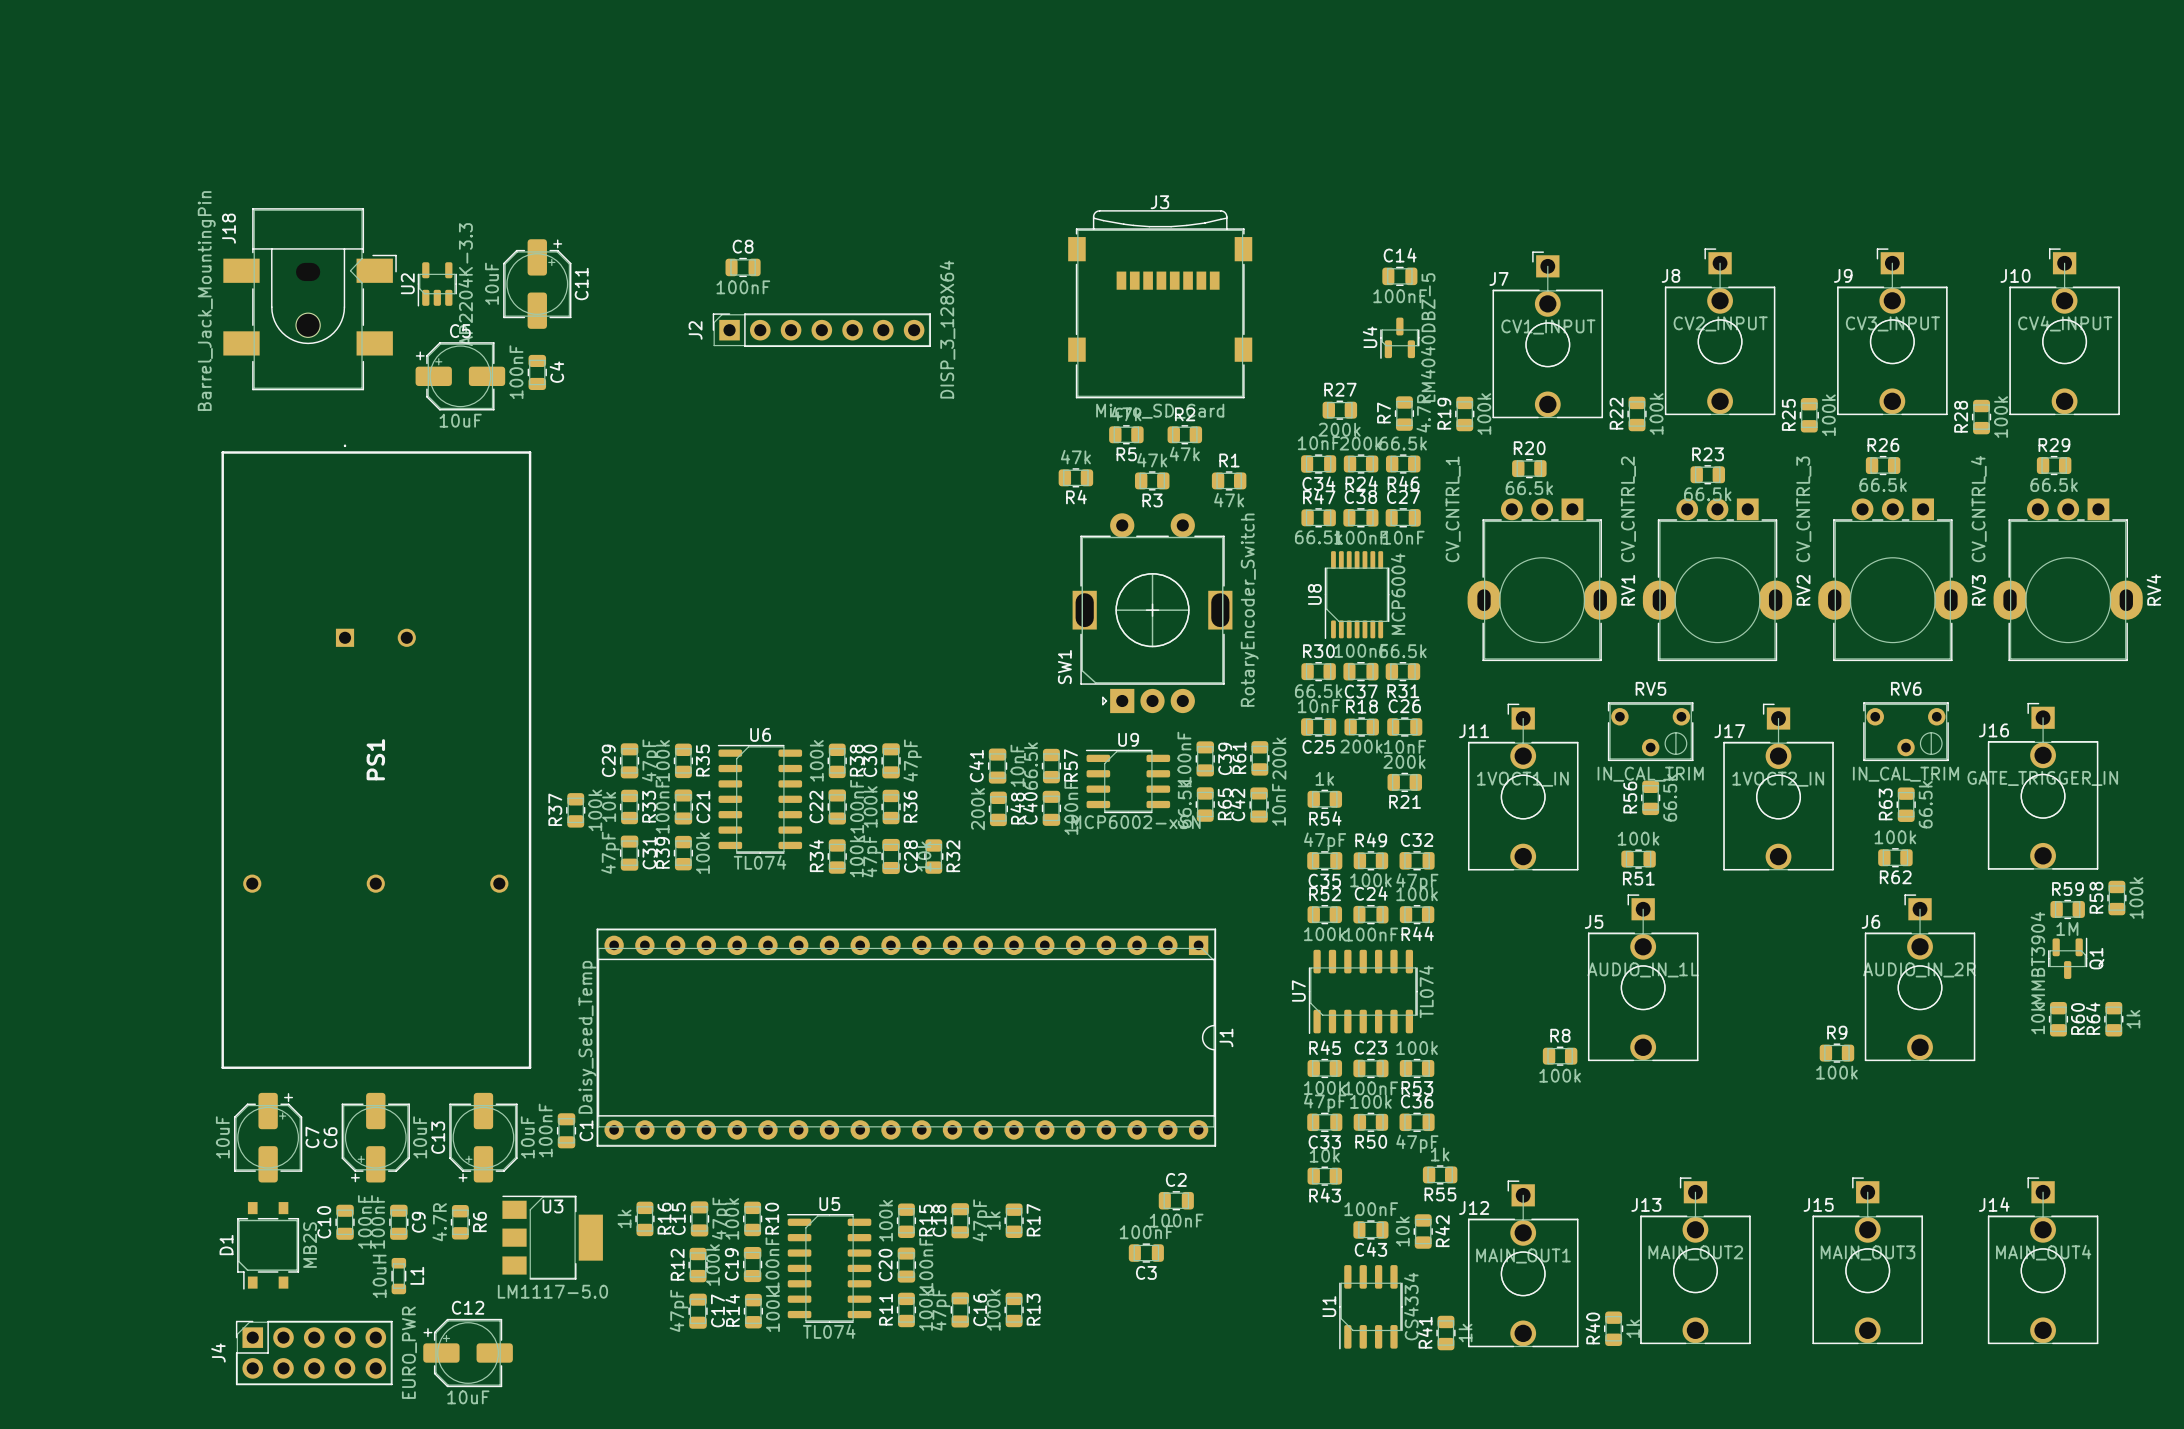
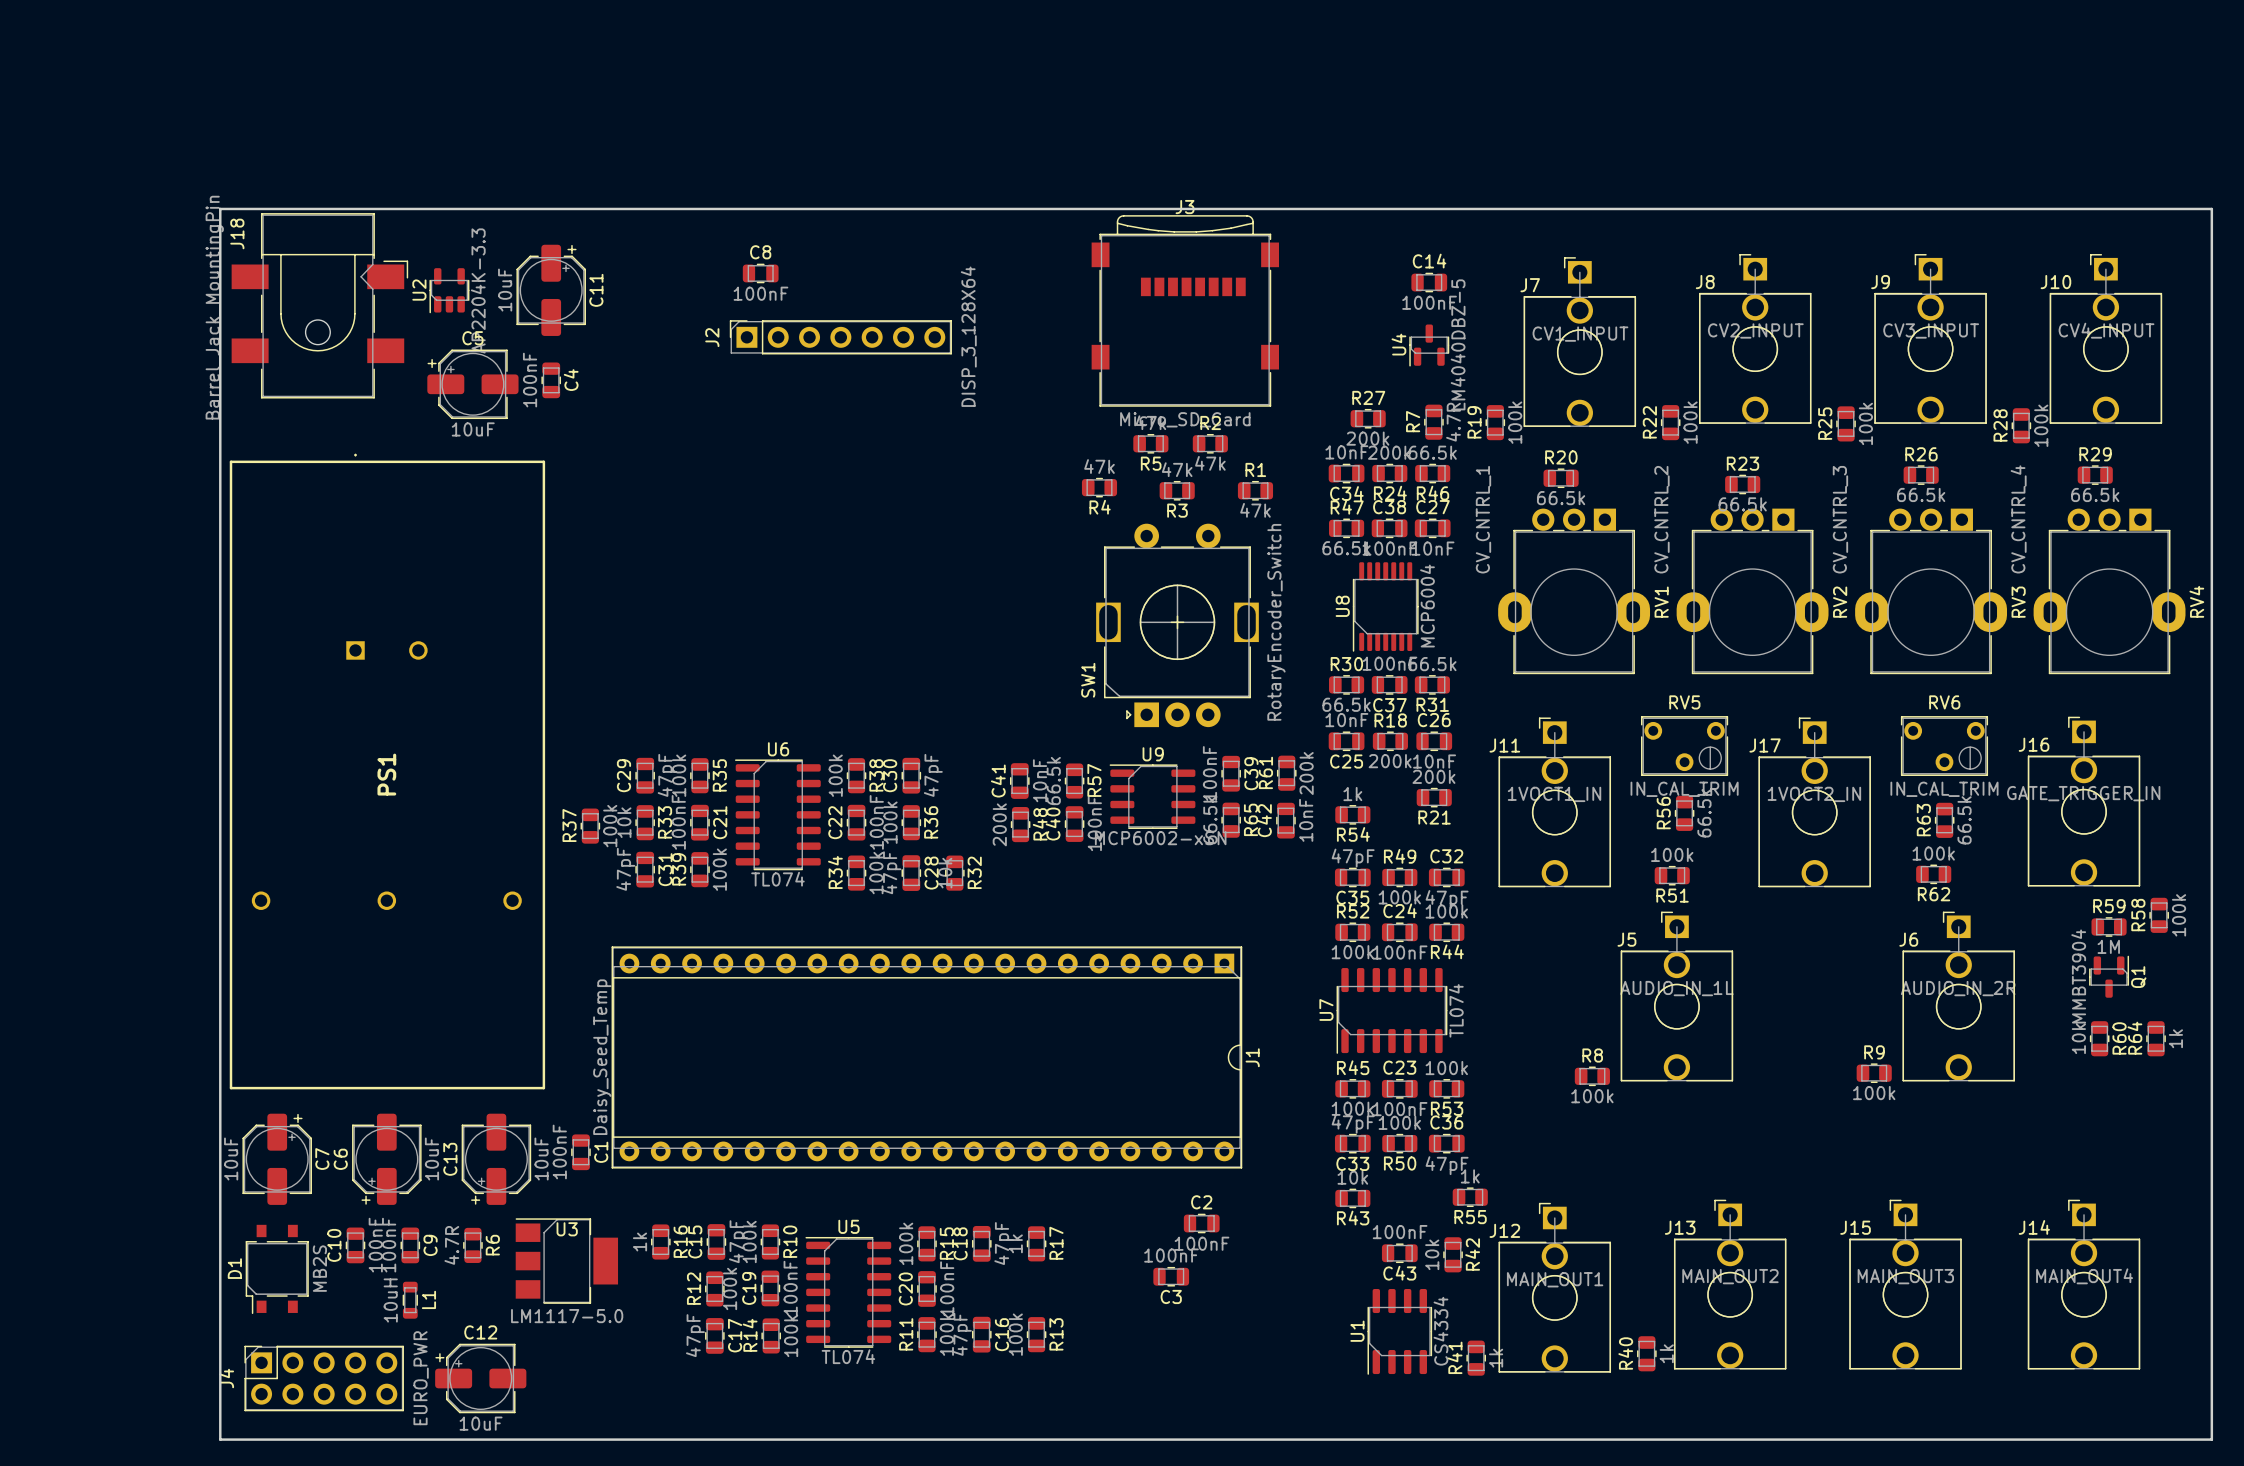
board edge: none -> (220, 208) (220, 1439) (2211, 1439) (2211, 208) (220, 208)

